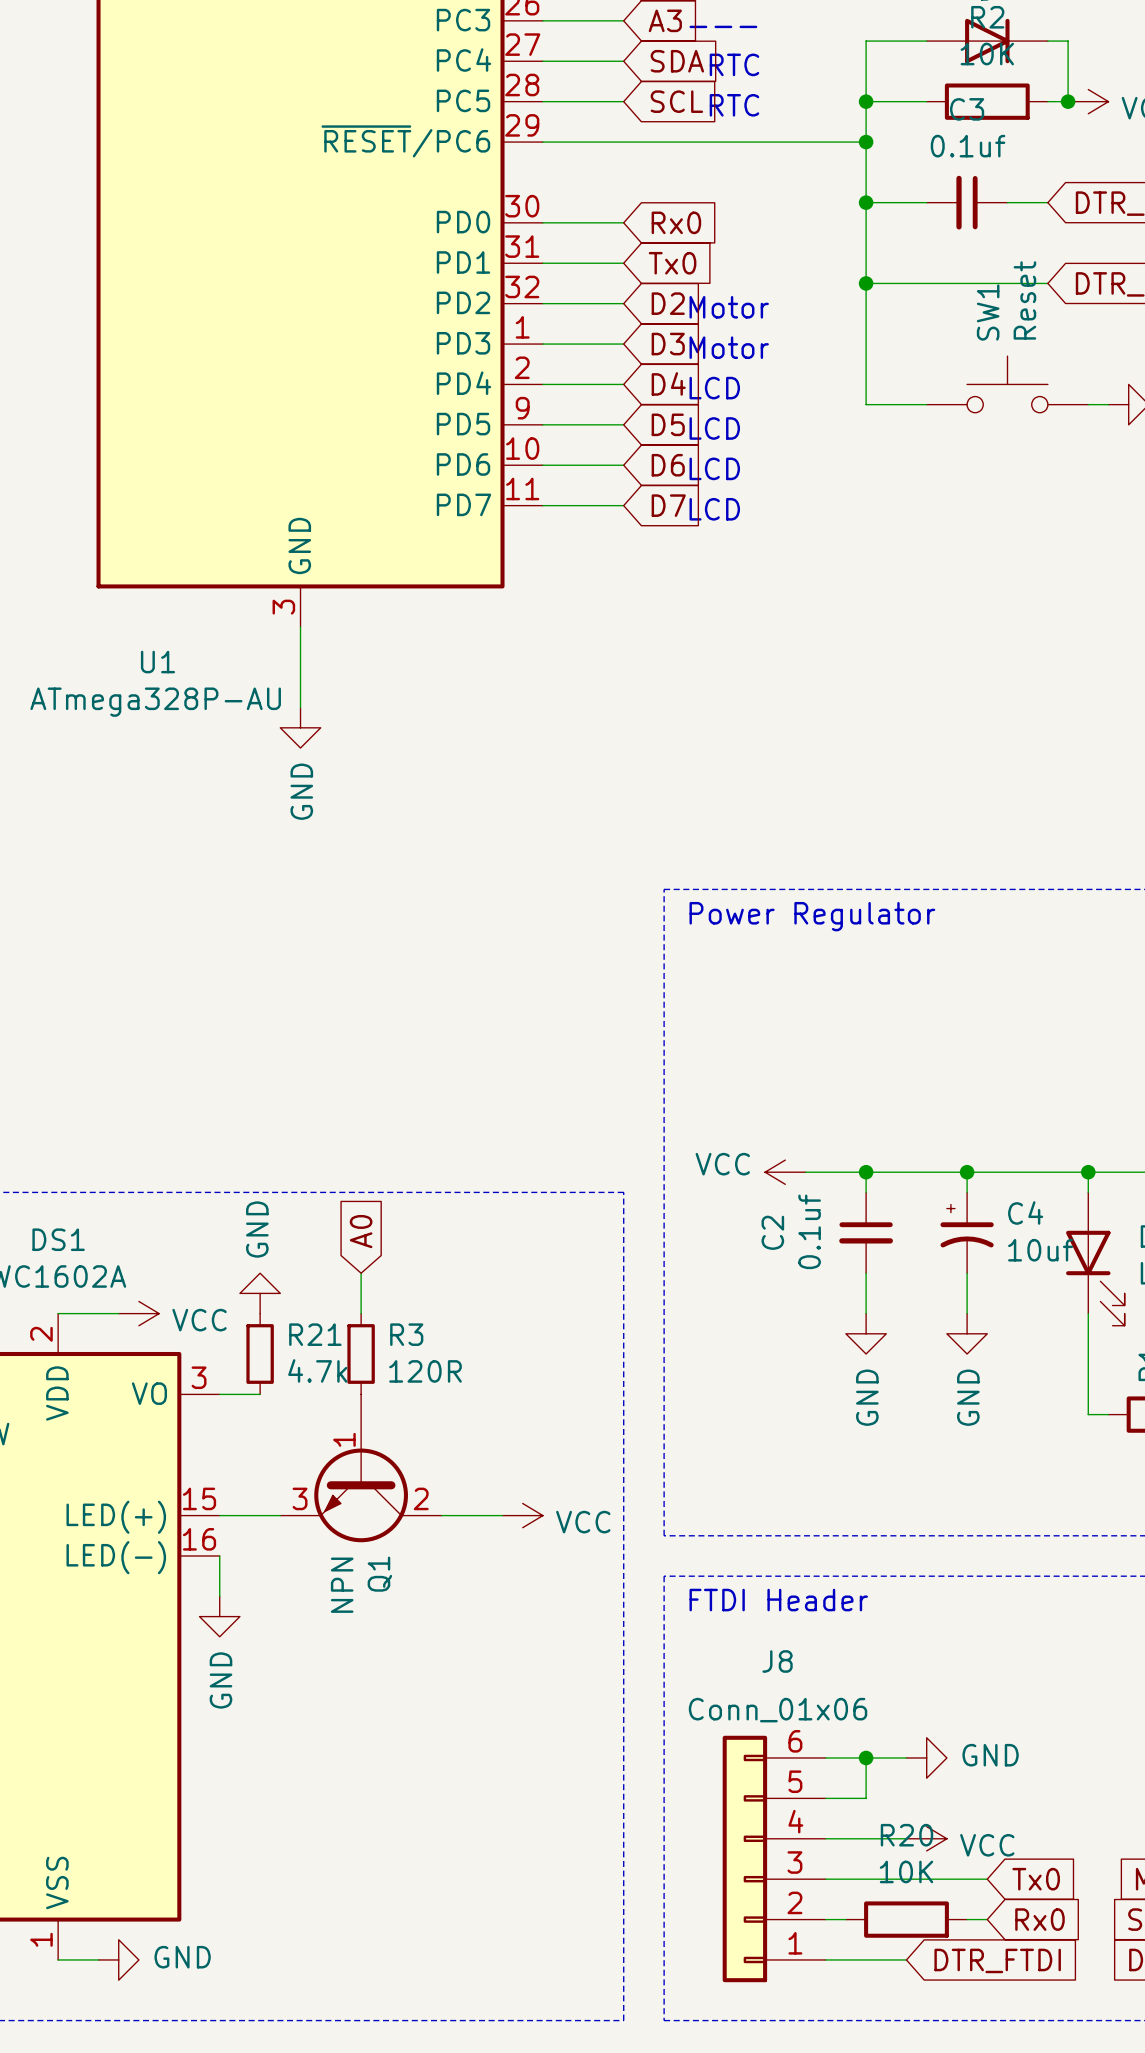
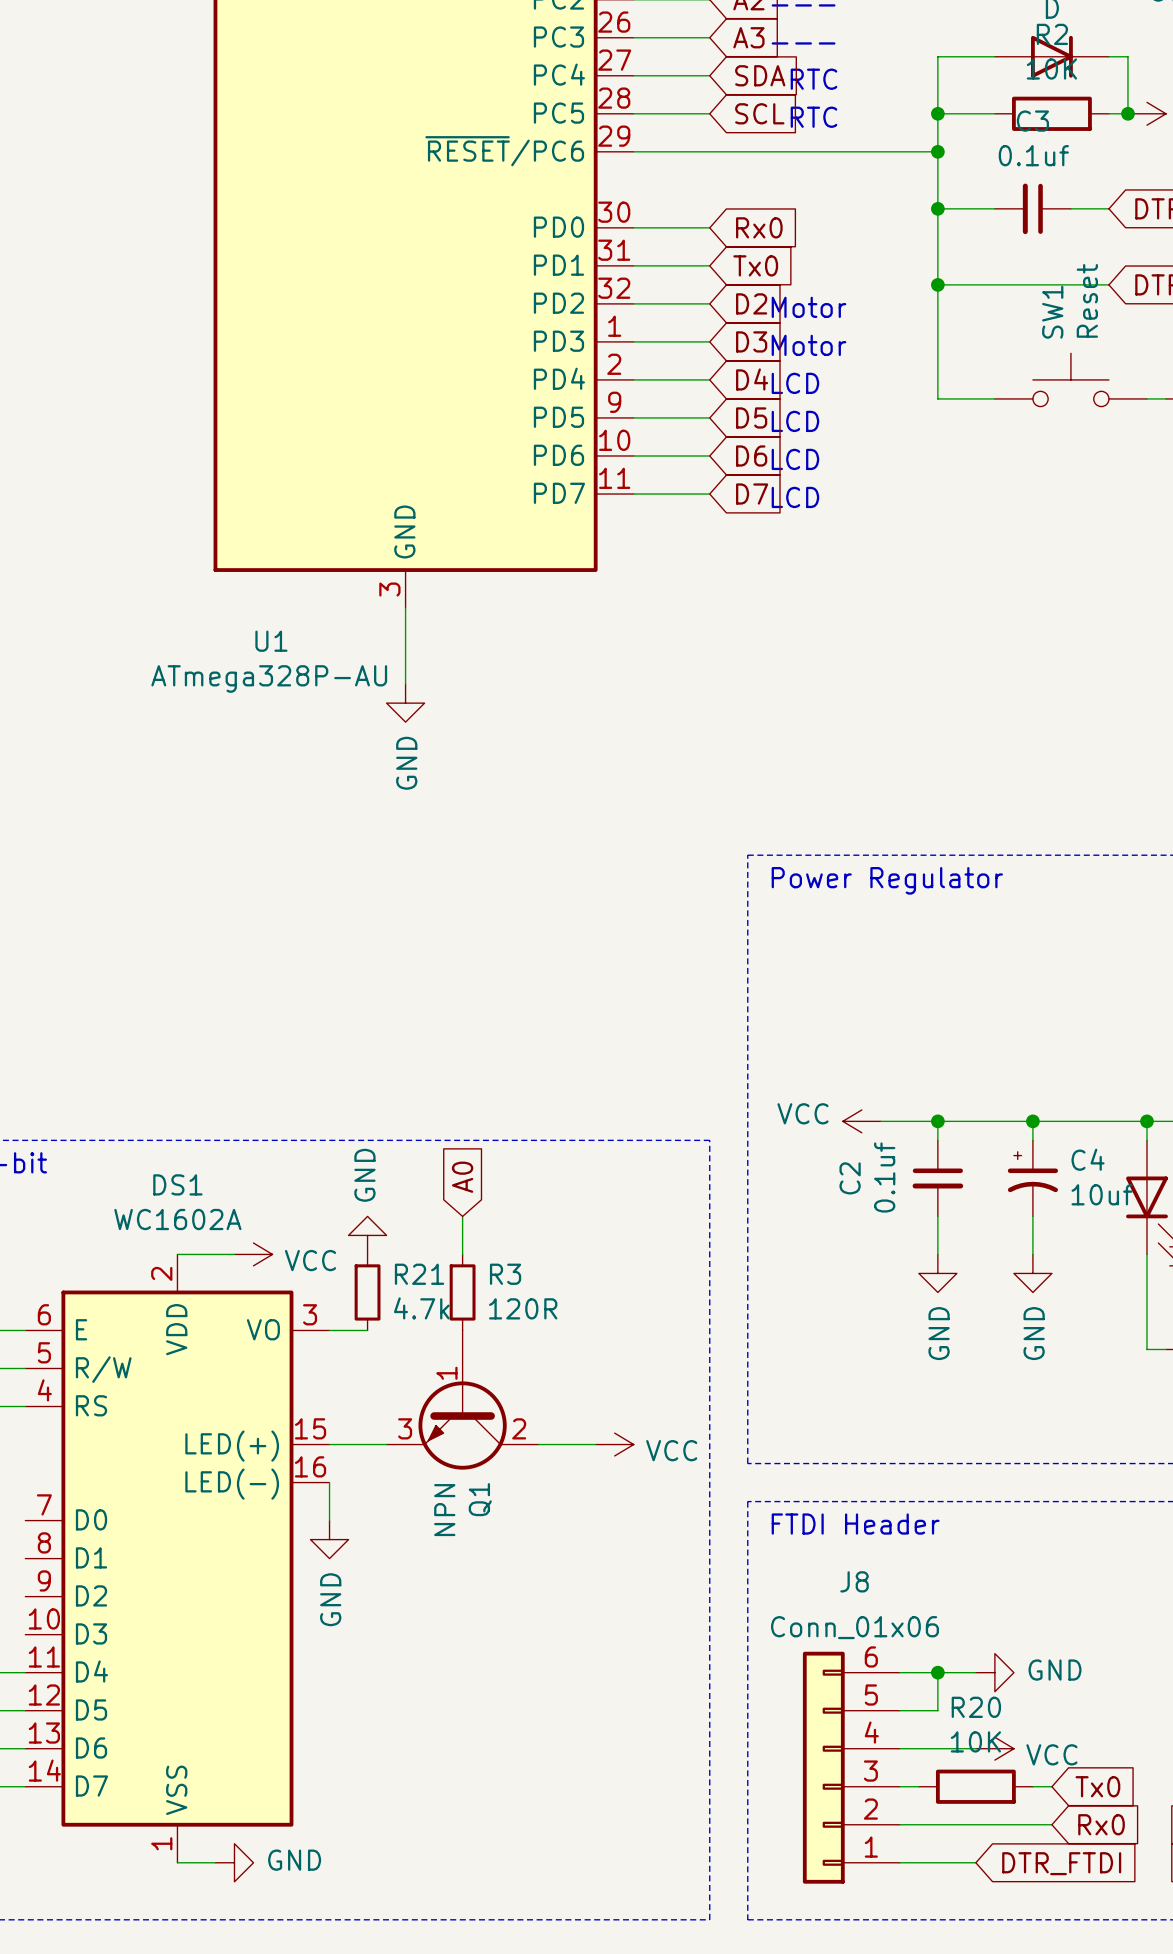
wire: (845, 1879) (967, 1879) -> (918, 1824) (1032, 1824)
R20 position: (906, 1919) -> (975, 1786)

